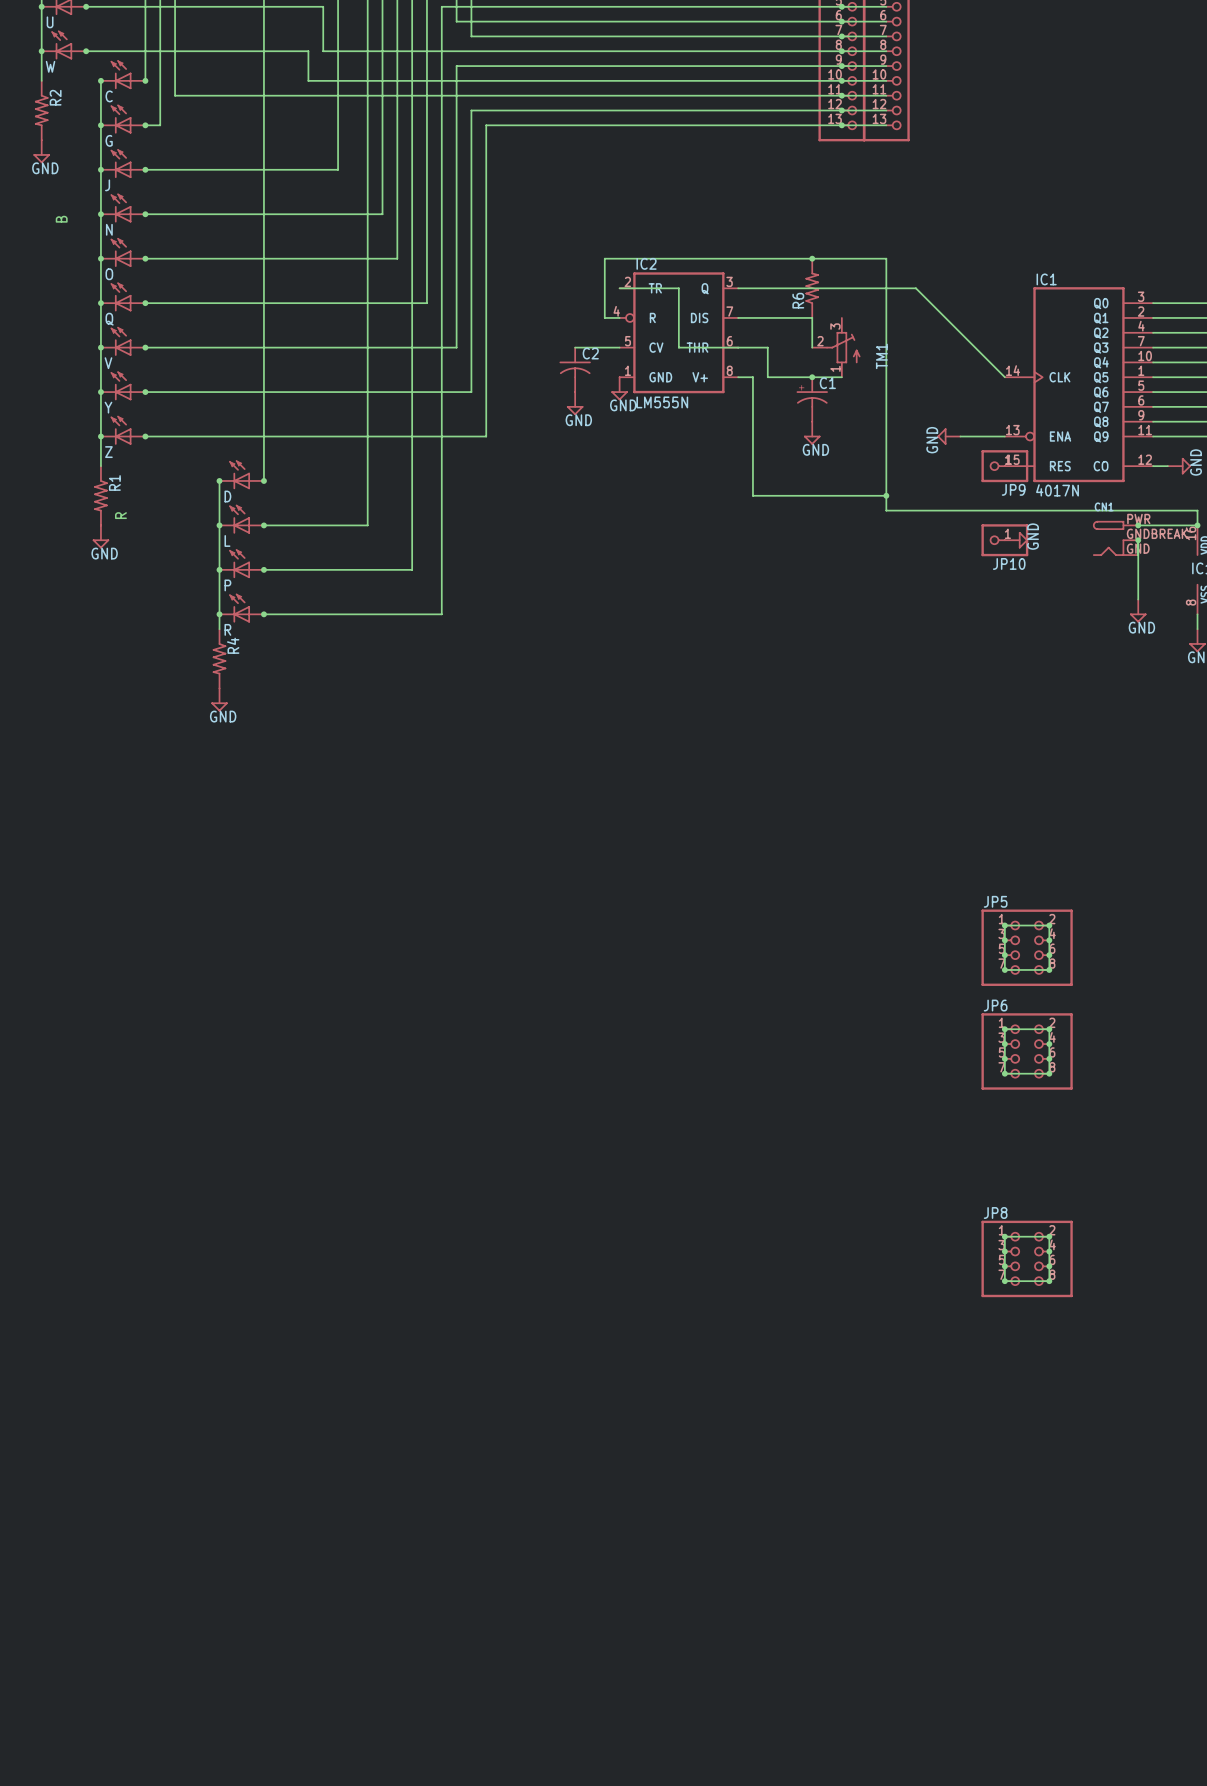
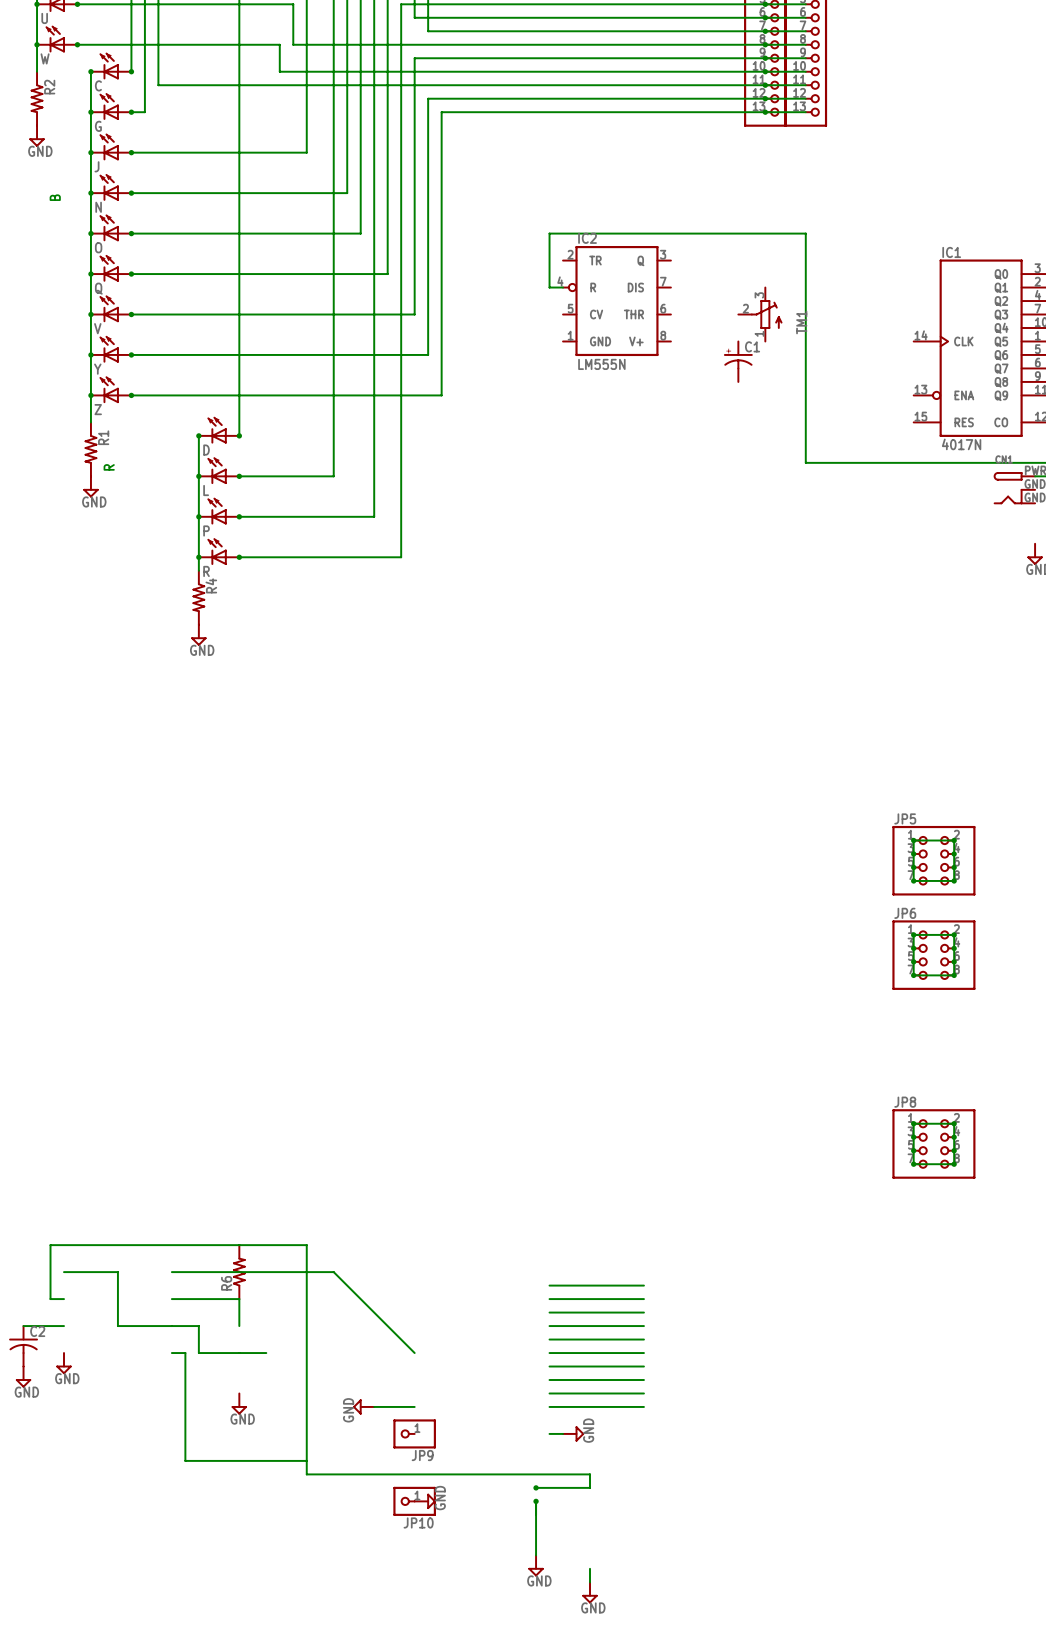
junction: (812, 258) -> none
wire: (619, 288) (678, 288) (678, 347) (767, 347) (767, 377) (841, 377) -> none
wire: (738, 288) (915, 288) (1004, 377) -> none
R6 position: (812, 288) -> (239, 1272)
wire: (738, 317) (812, 317) (812, 347) -> none
wire: (575, 347) (619, 347) -> none
C2 position: (575, 369) -> (23, 1346)
wire: (738, 377) (752, 377) (752, 495) (886, 495) -> none
junction: (812, 377) -> none
power symbol: GND (619, 388) -> none
power symbol: GND (575, 403) -> none
power symbol: GND (812, 433) -> none
power symbol: GND (948, 436) -> none
wire: (960, 436) (1004, 436) -> none
JP9 position: (1004, 466) -> (414, 1433)
junction: (886, 495) -> none
junction: (1138, 525) -> none
JP10 position: (1004, 540) -> (414, 1501)
power symbol: GND (1016, 540) -> none
wire: (1138, 540) (1138, 599) -> none
junction: (1138, 540) -> none
wire: none -> (63, 1272) (117, 1272) (117, 1326) (198, 1326) (198, 1353) (266, 1353)
wire: none -> (171, 1272) (333, 1272) (414, 1353)
wire: none -> (549, 1285) (643, 1285)
wire: none -> (63, 1299) (50, 1299) (50, 1245) (306, 1245) (306, 1474) (590, 1474) (590, 1487) (536, 1487)
wire: none -> (171, 1299) (239, 1299) (239, 1326)
wire: none -> (549, 1299) (643, 1299)
wire: none -> (549, 1312) (643, 1312)
wire: none -> (23, 1326) (63, 1326)
wire: none -> (549, 1326) (643, 1326)
wire: none -> (549, 1339) (643, 1339)
wire: none -> (171, 1353) (185, 1353) (185, 1460) (306, 1460)
wire: none -> (549, 1353) (643, 1353)
power symbol: none -> GND (63, 1363)
wire: none -> (549, 1366) (643, 1366)
power symbol: none -> GND (23, 1376)
wire: none -> (549, 1380) (643, 1380)
wire: none -> (549, 1393) (643, 1393)
power symbol: none -> GND (239, 1403)
power symbol: none -> GND (363, 1406)
wire: none -> (374, 1406) (414, 1406)
wire: none -> (549, 1406) (643, 1406)
wire: none -> (549, 1433) (563, 1433)
power symbol: none -> GND (573, 1433)
junction: none -> (536, 1487)
power symbol: none -> GND (425, 1501)
wire: none -> (536, 1501) (536, 1555)
junction: none -> (536, 1501)
power symbol: none -> GND (536, 1565)
wire: none -> (590, 1568) (590, 1582)
power symbol: none -> GND (590, 1592)

